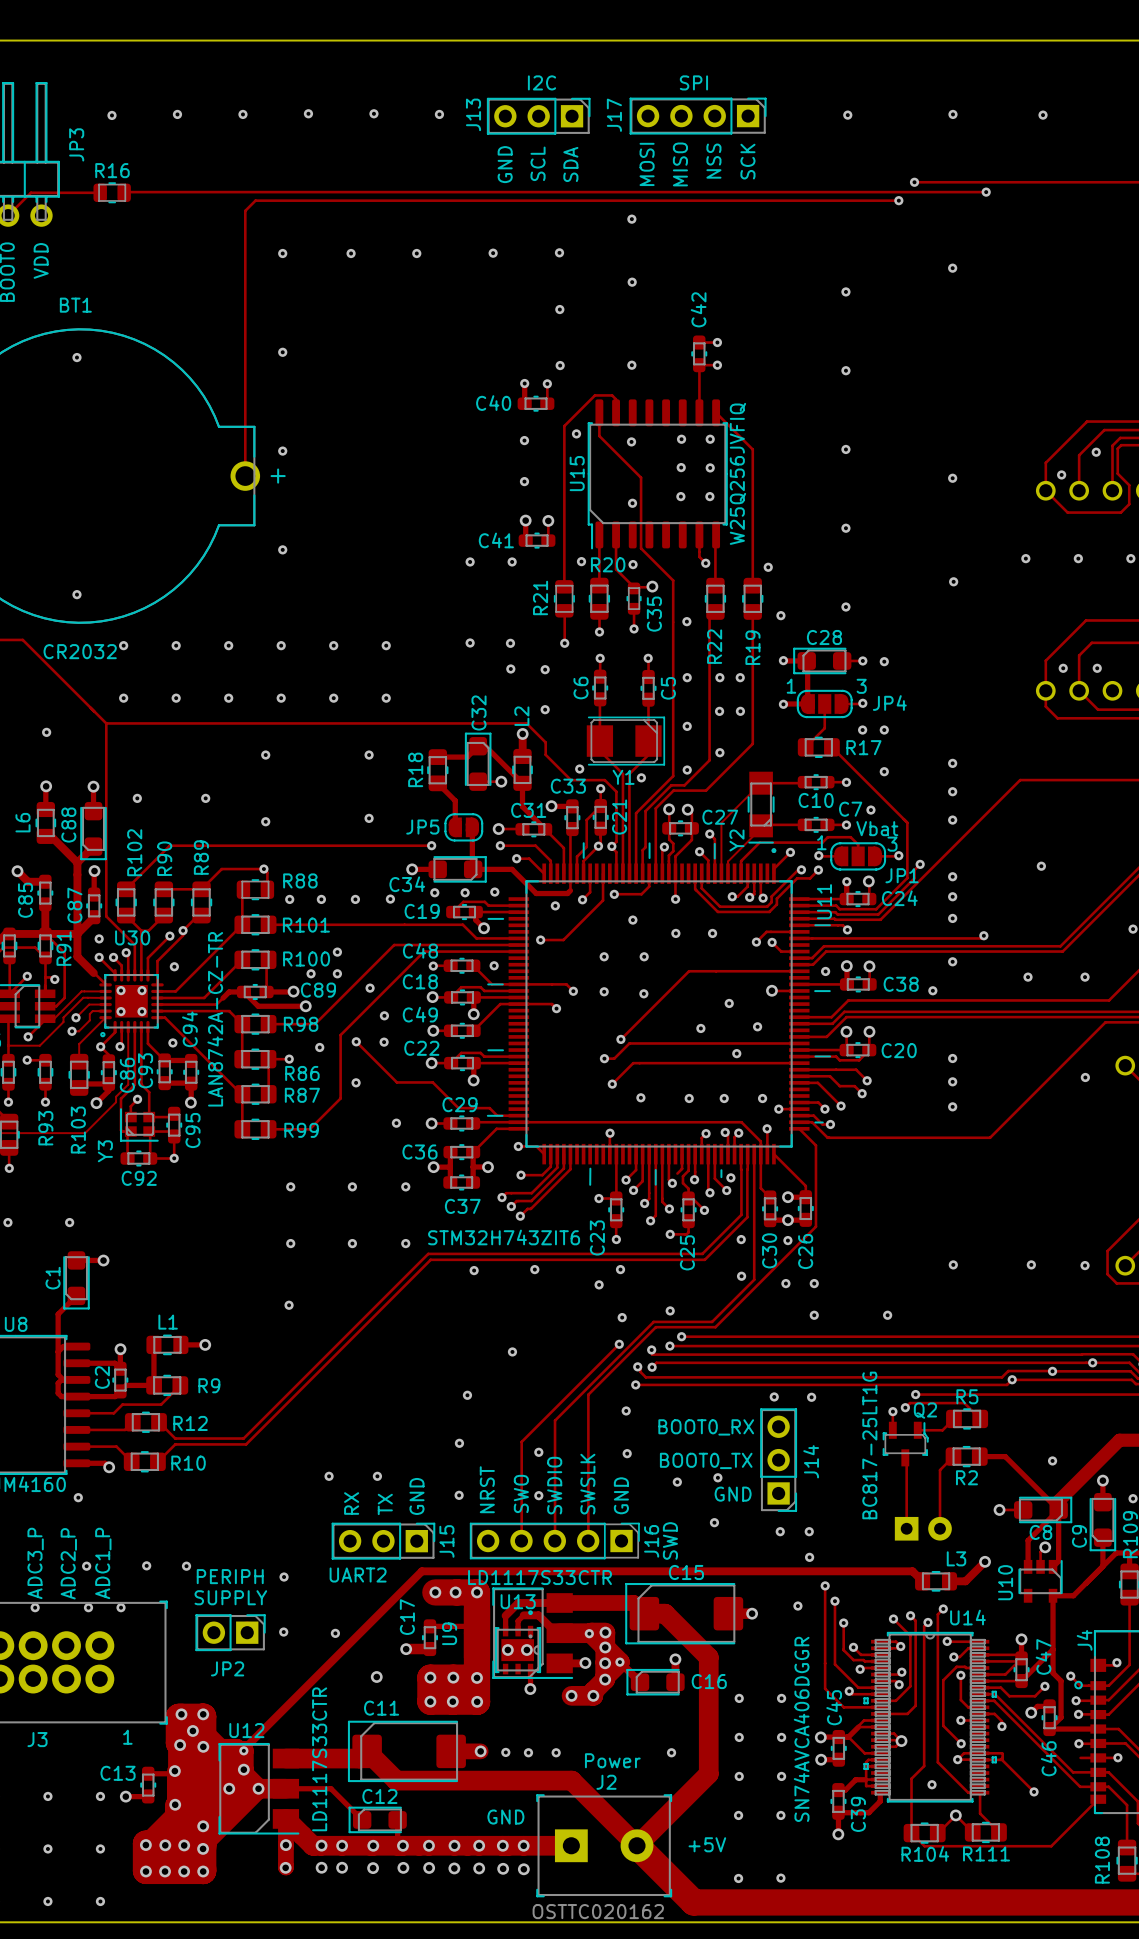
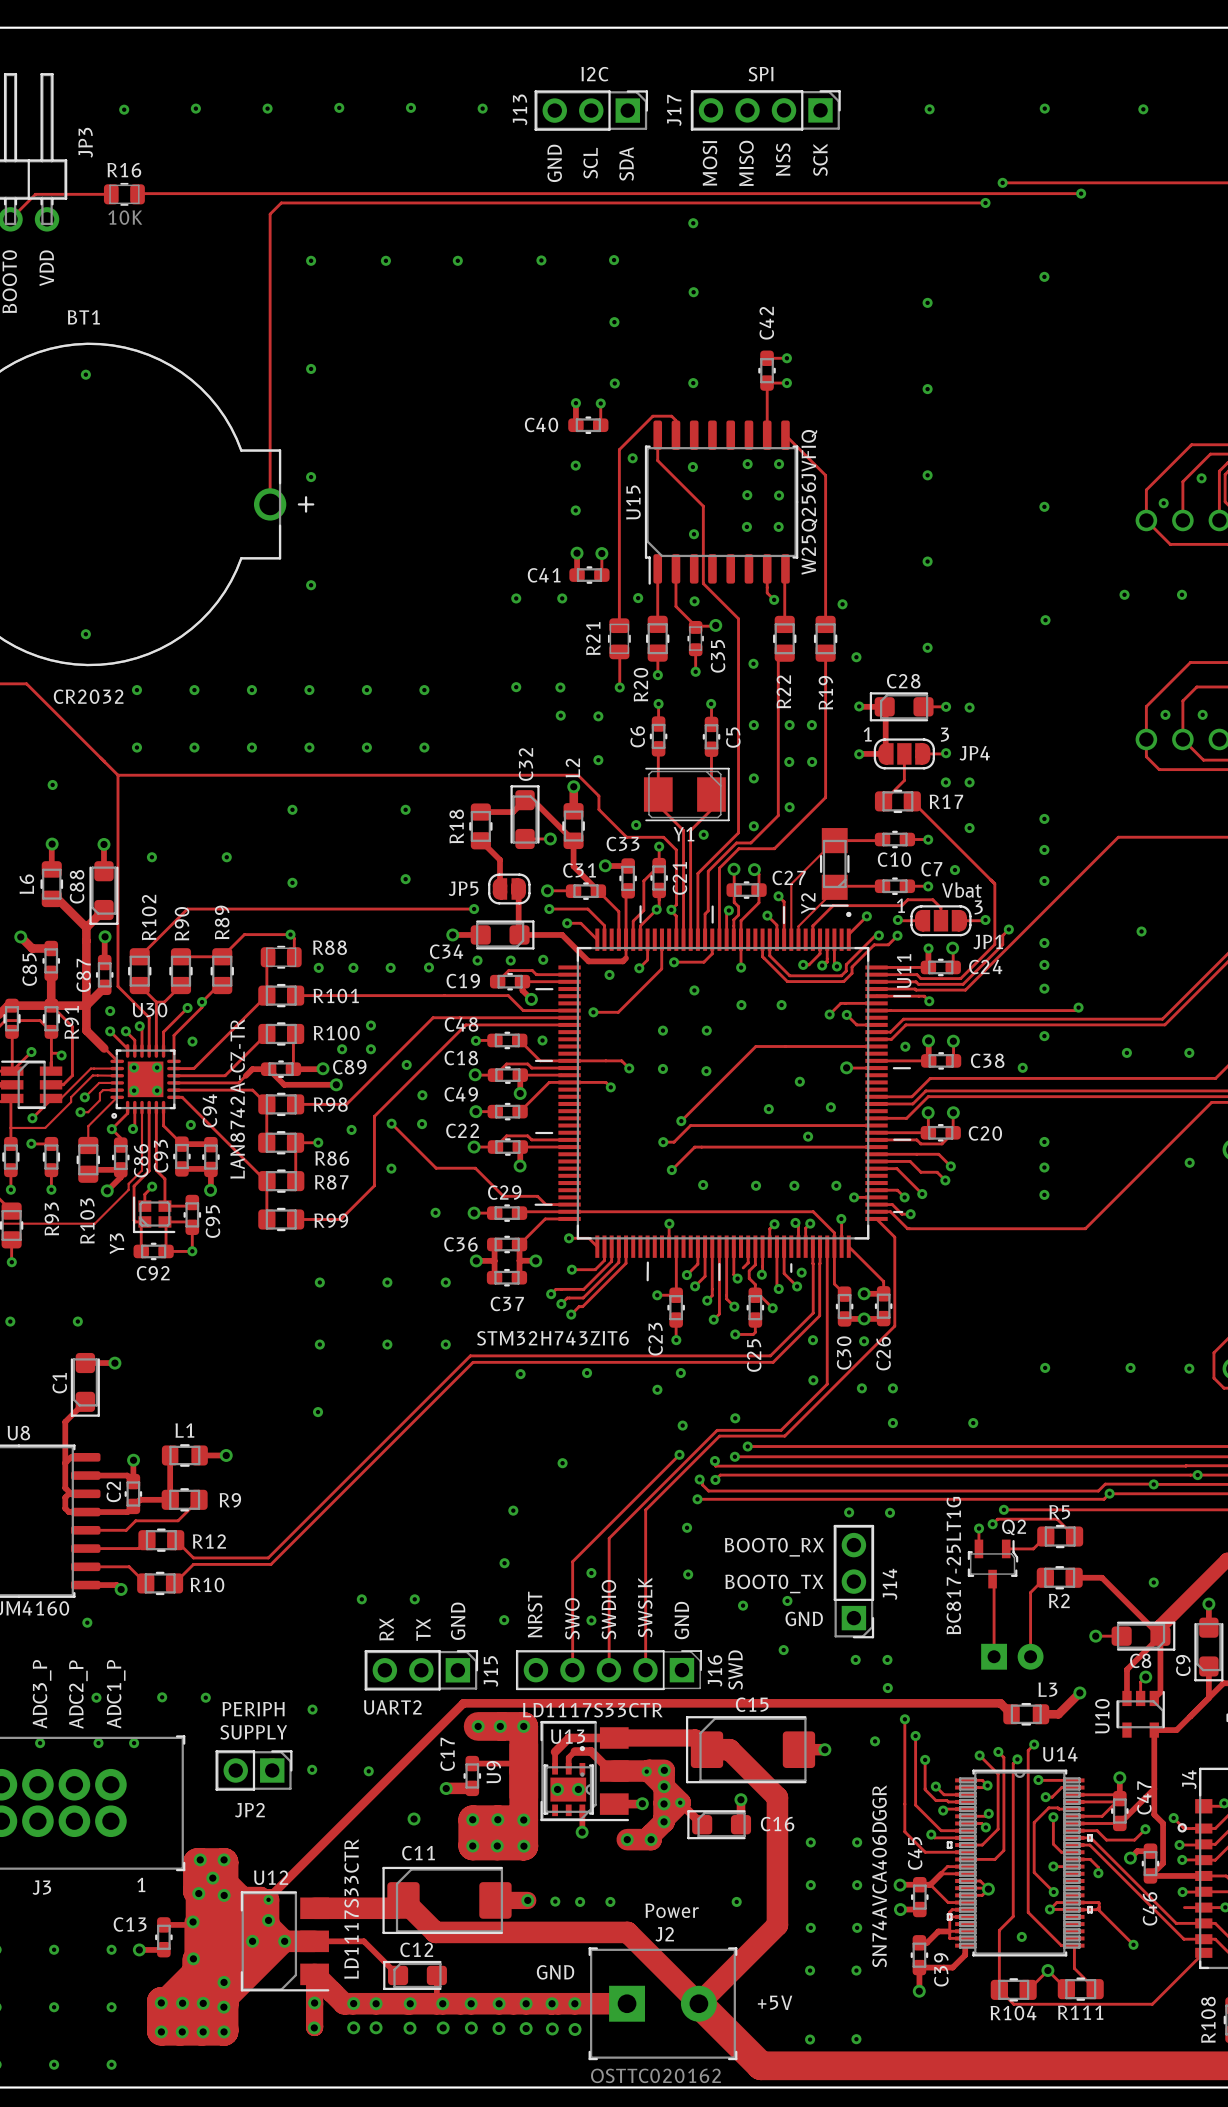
R16 value: none -> 10K (125, 217)
R20 name rotation: 0° (608, 564) -> 90° counterclockwise (640, 684)
R20 name position: R20 (608, 564) -> R20 (640, 684)

